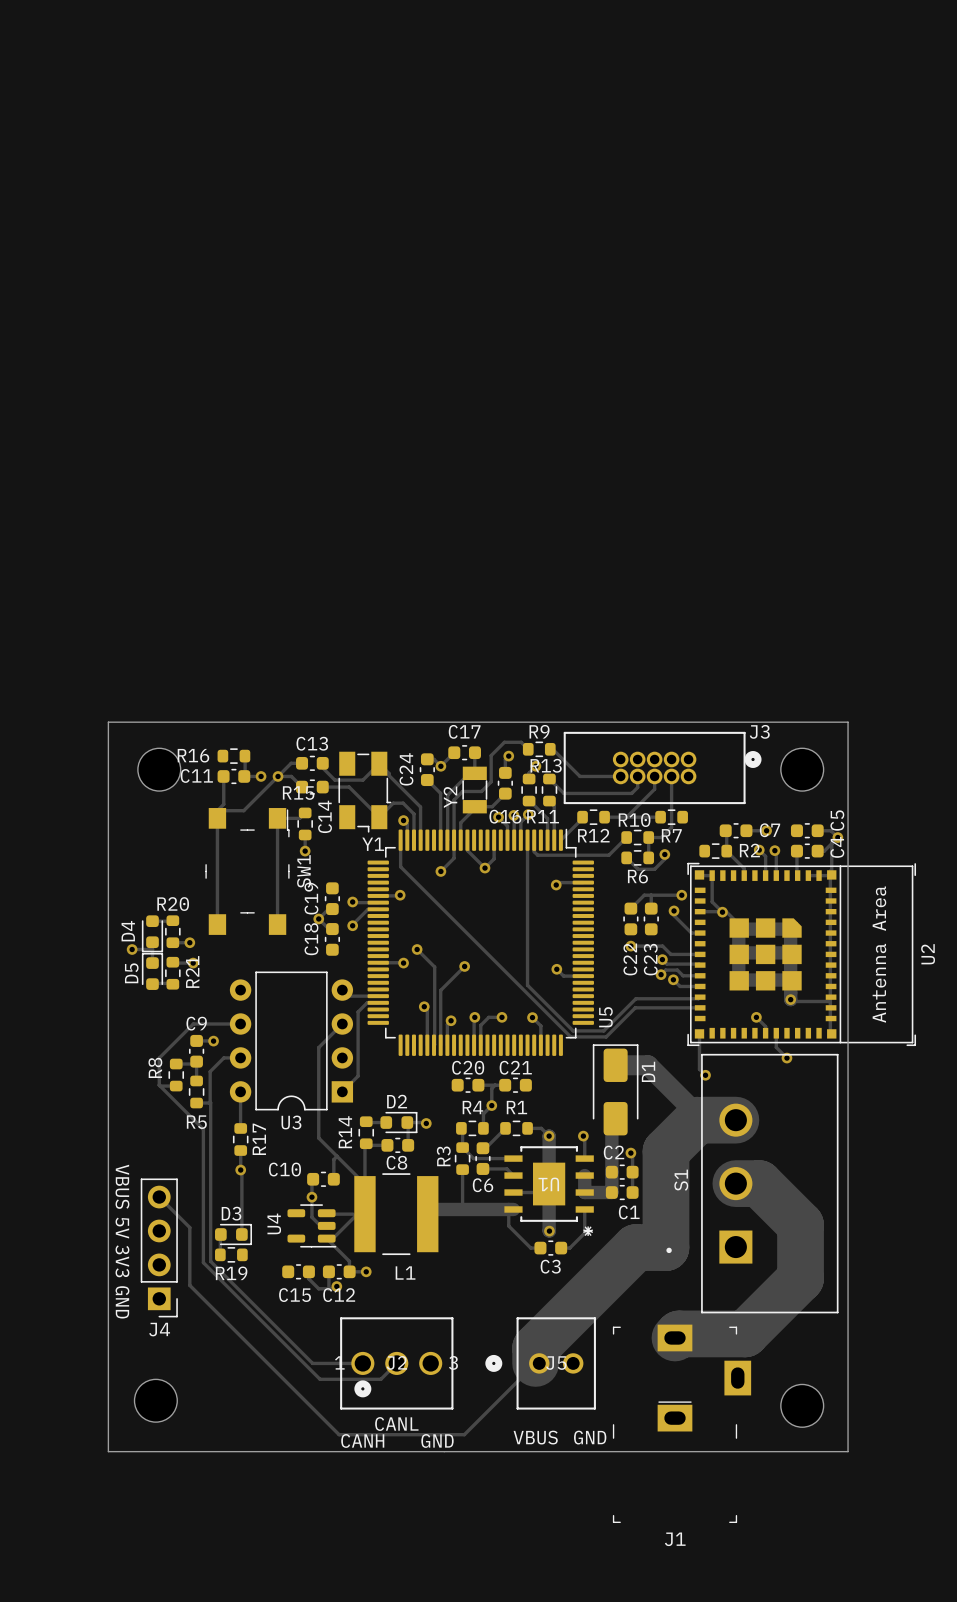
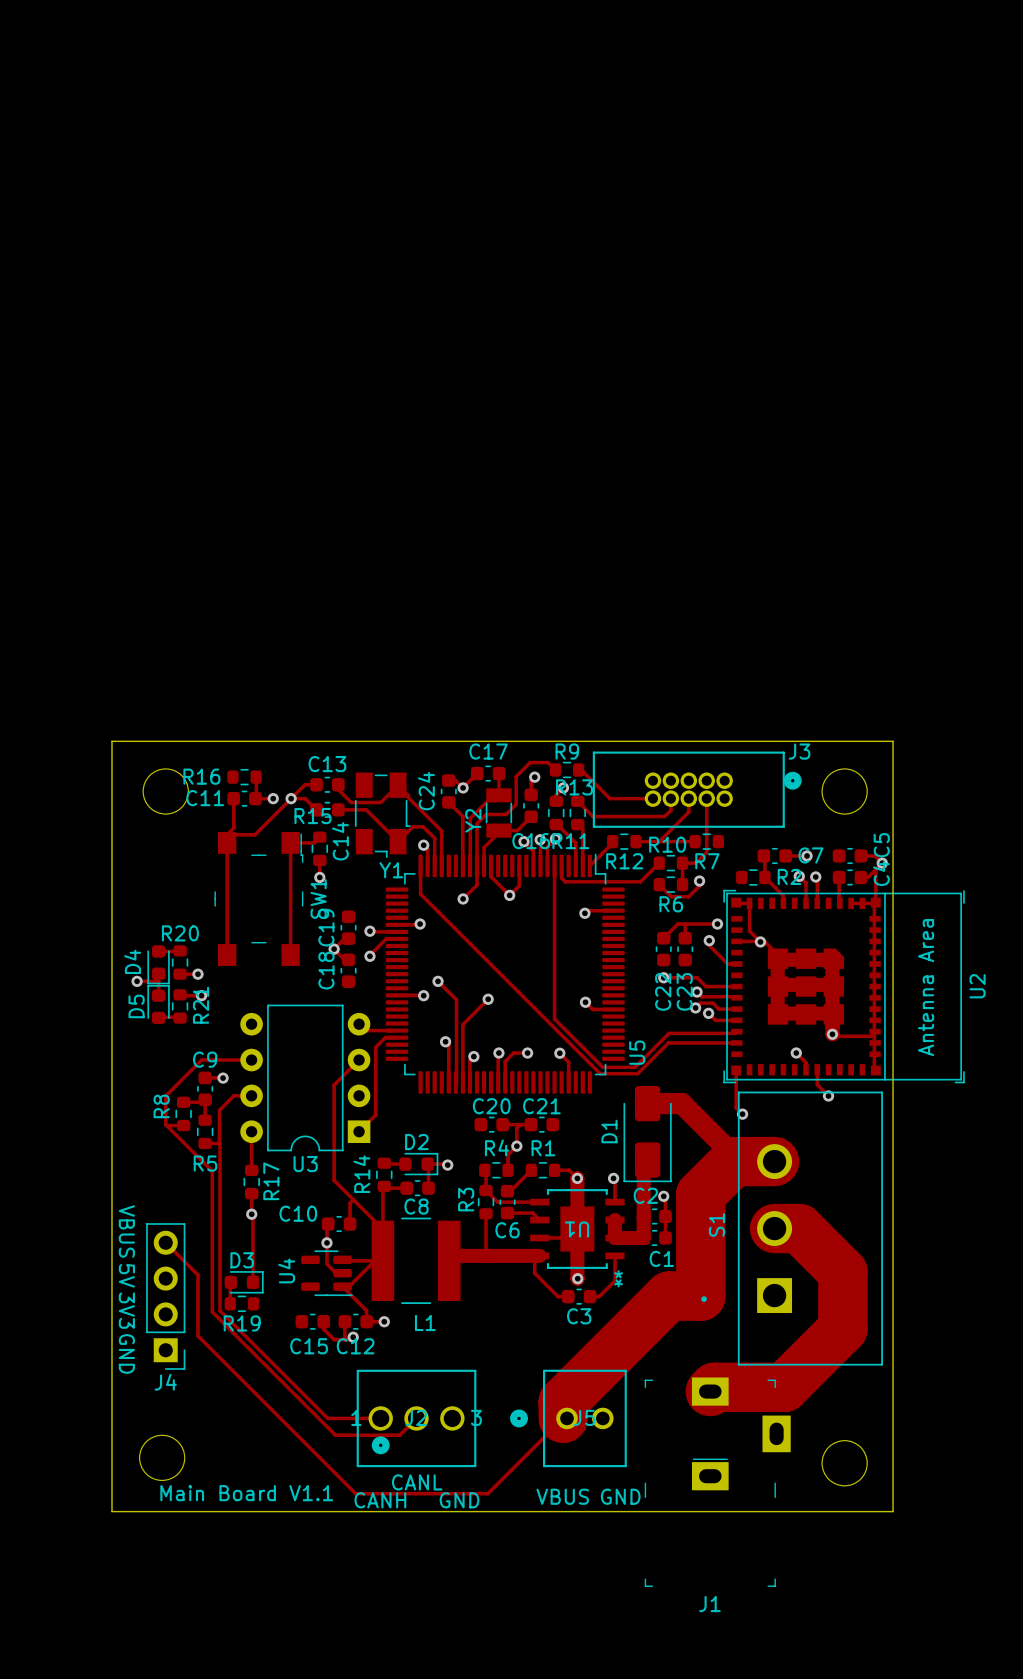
D1 rotation: 0° (615, 1089) -> 180° (647, 1134)
text: none -> Main Board V1.1 (246, 1493)

